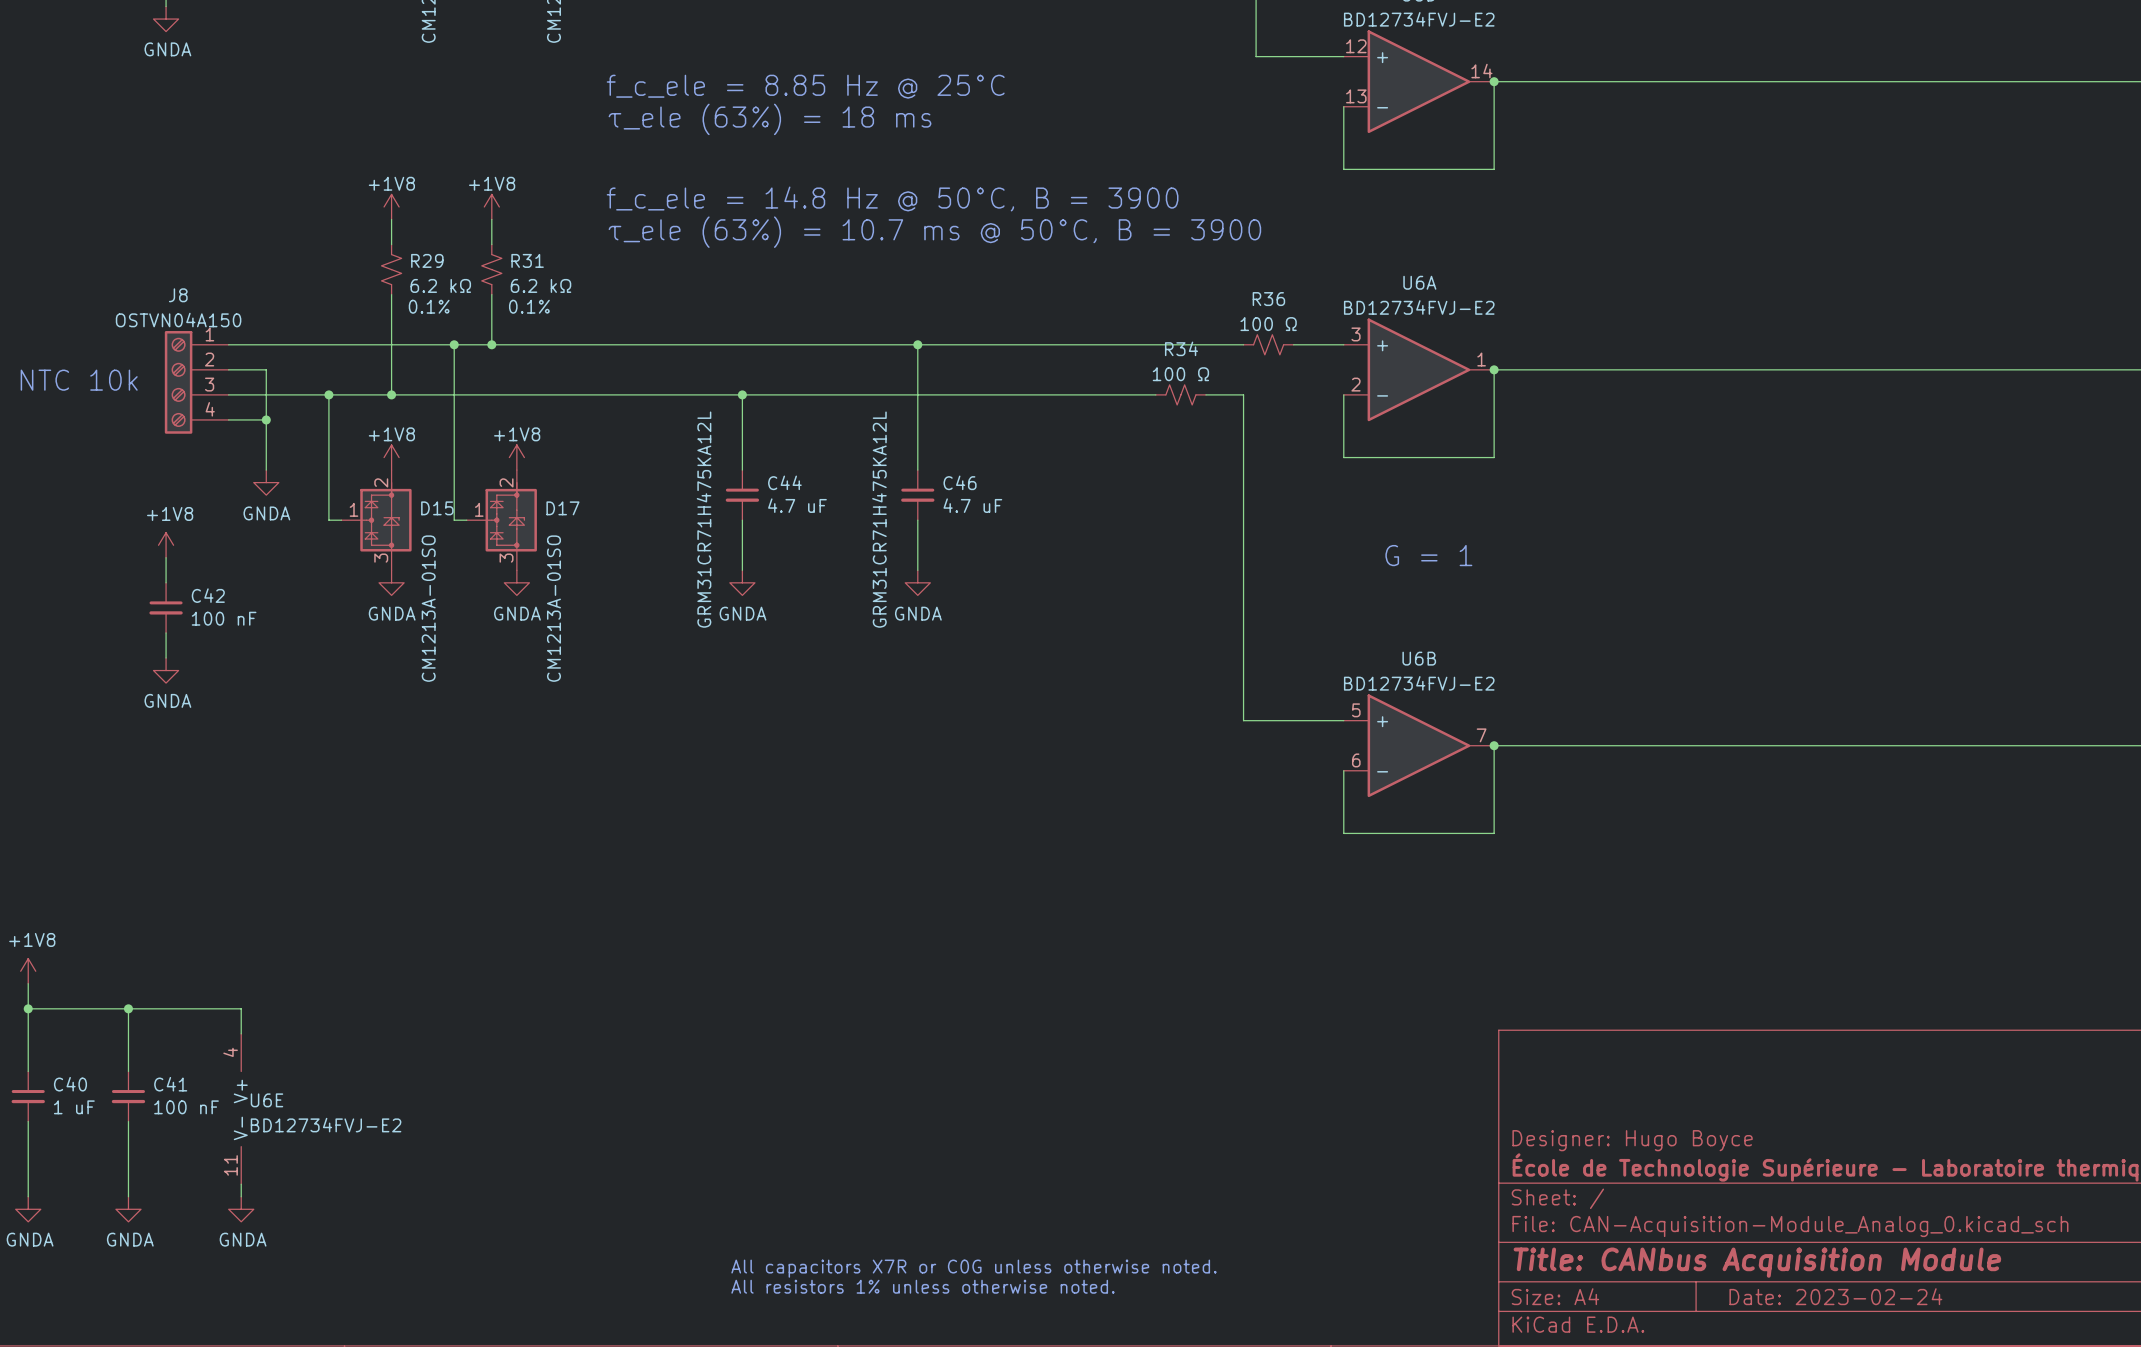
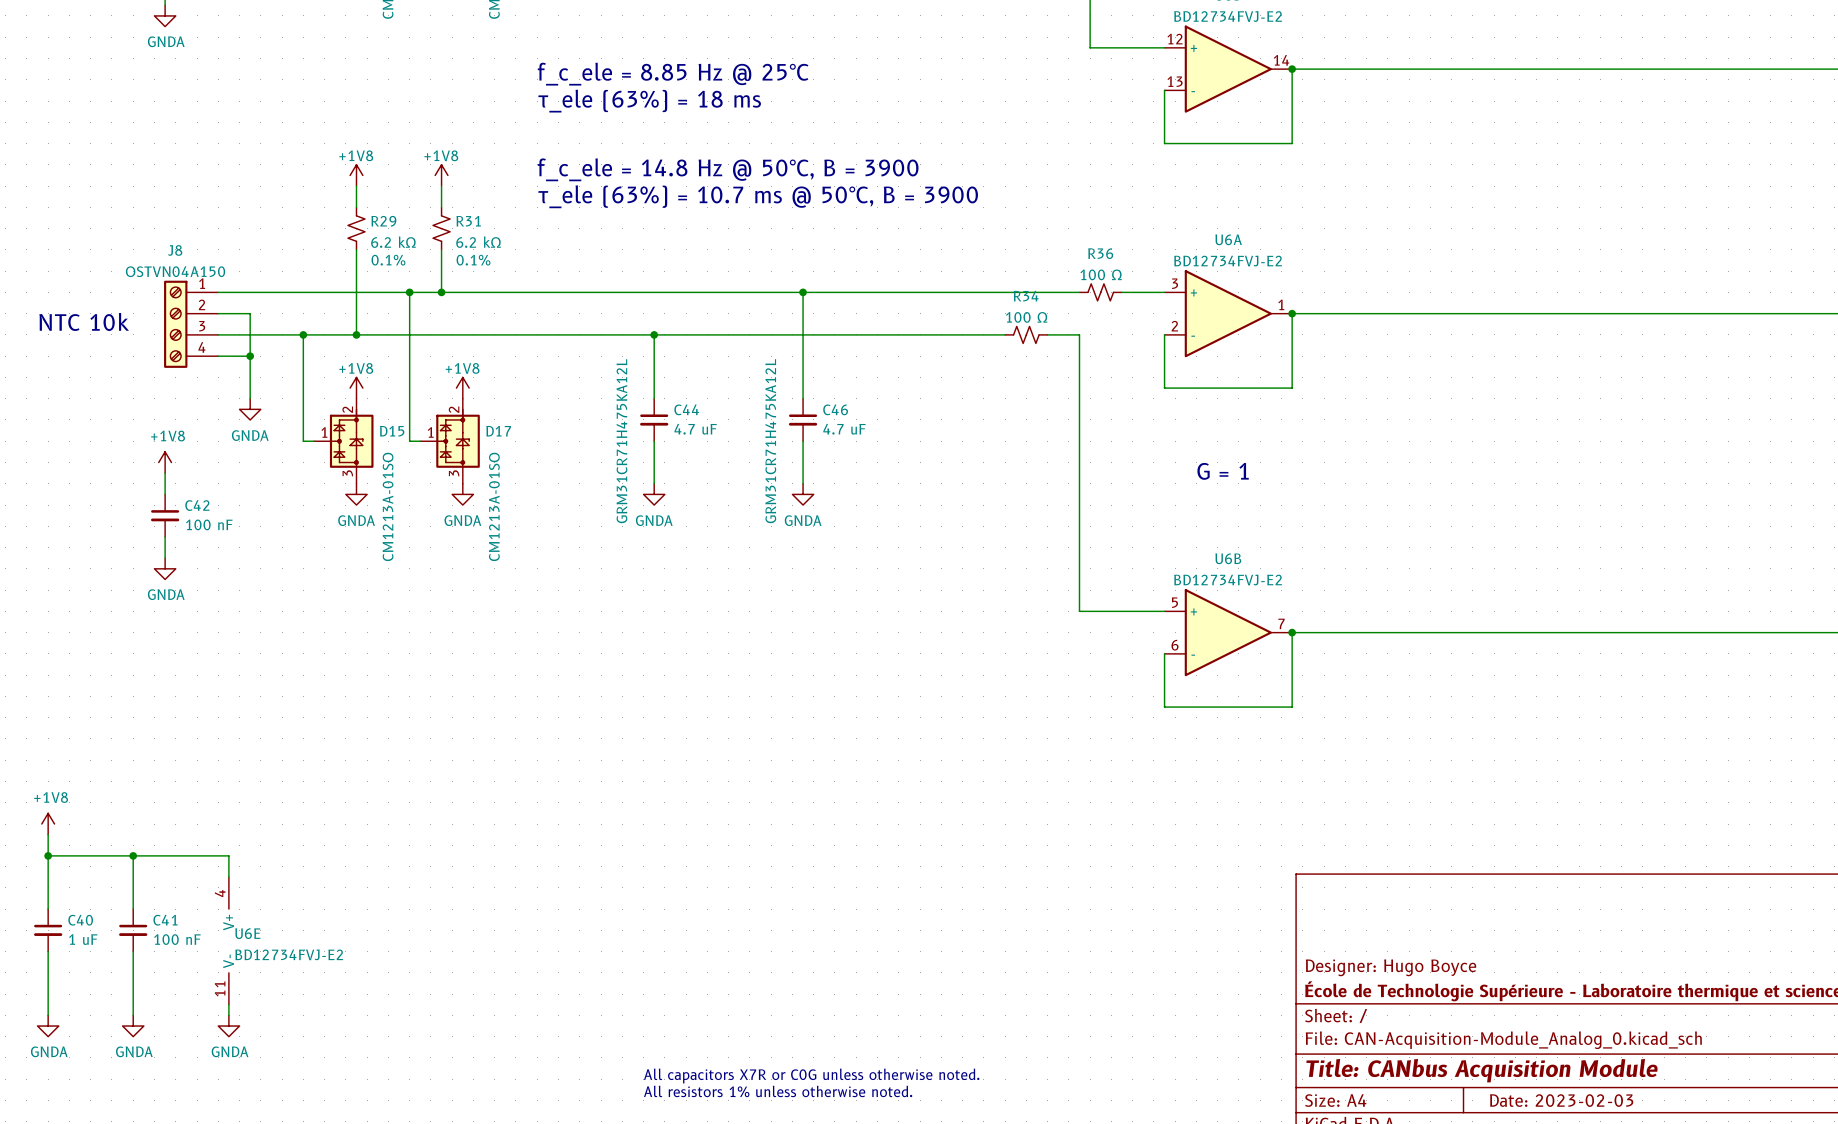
title block: Date: 2023-02-24 (1835, 1296) -> Date: 2023-02-03 (1561, 1100)

